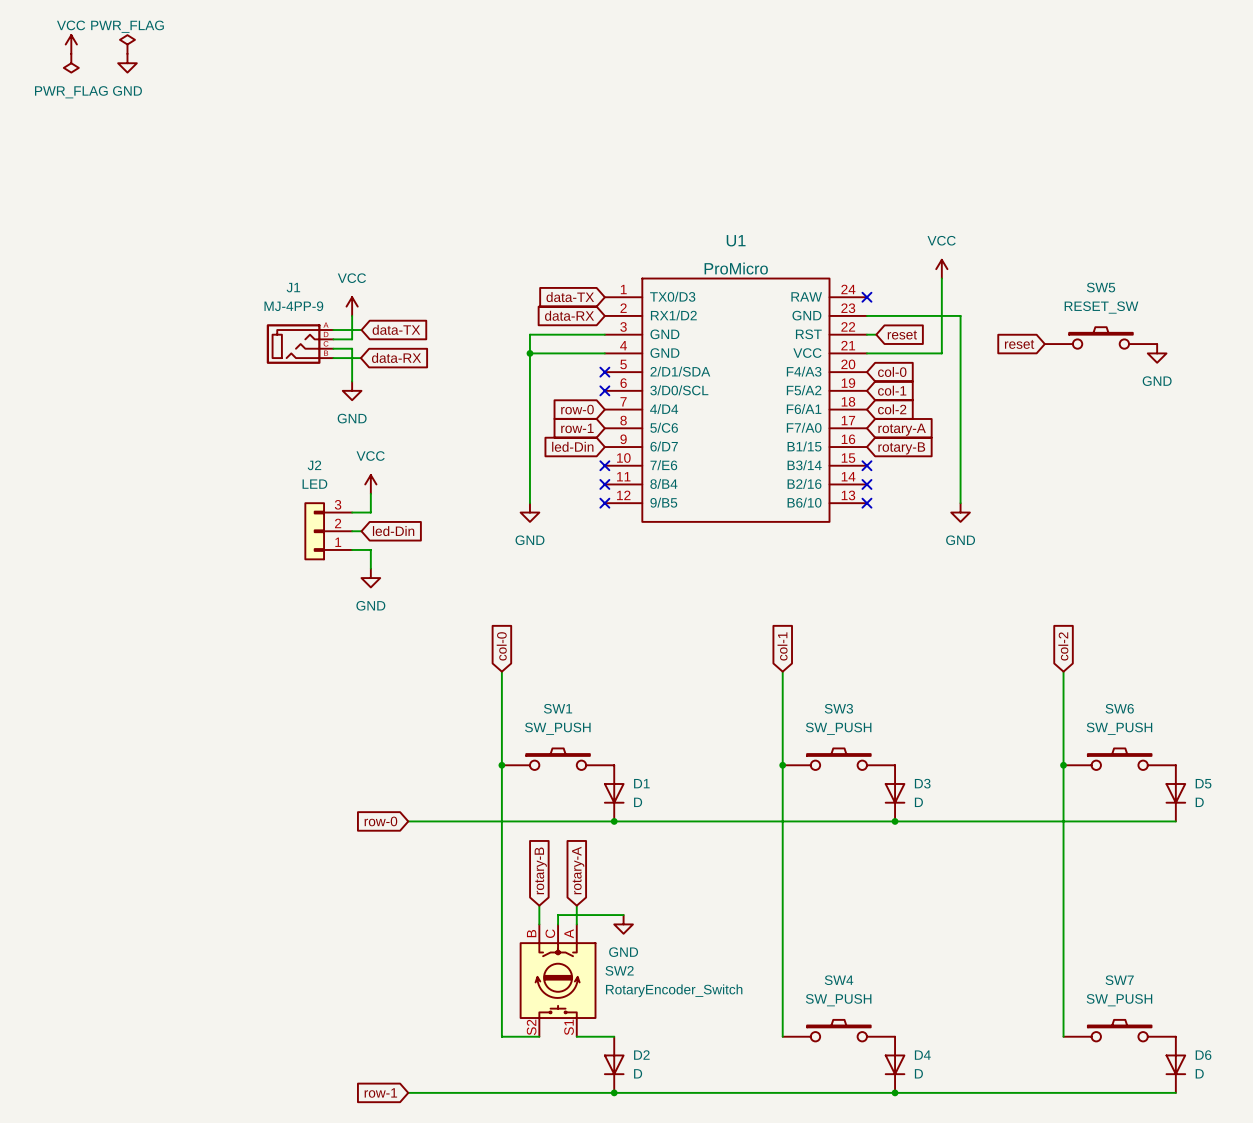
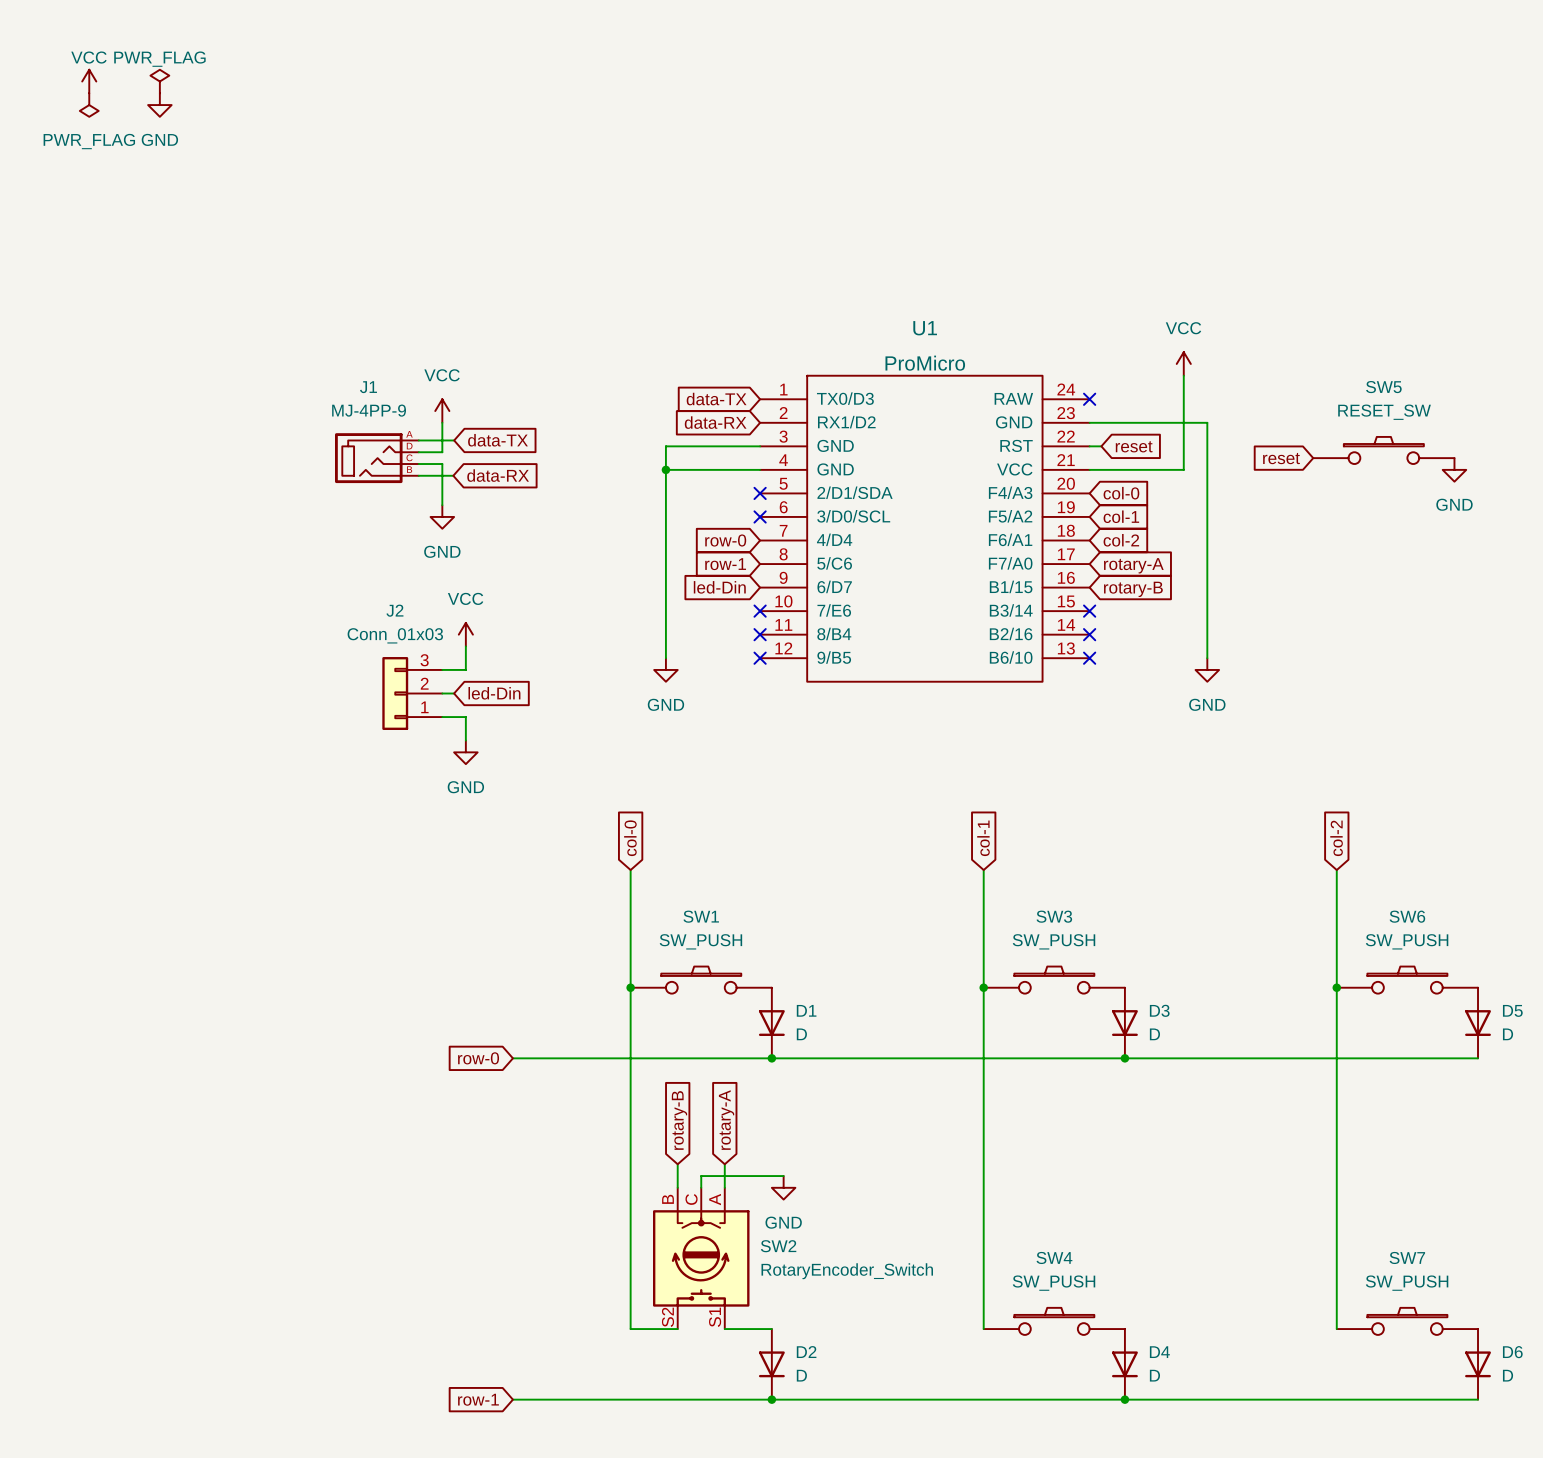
J2 value: LED (314, 484) -> Conn_01x03 (395, 635)

